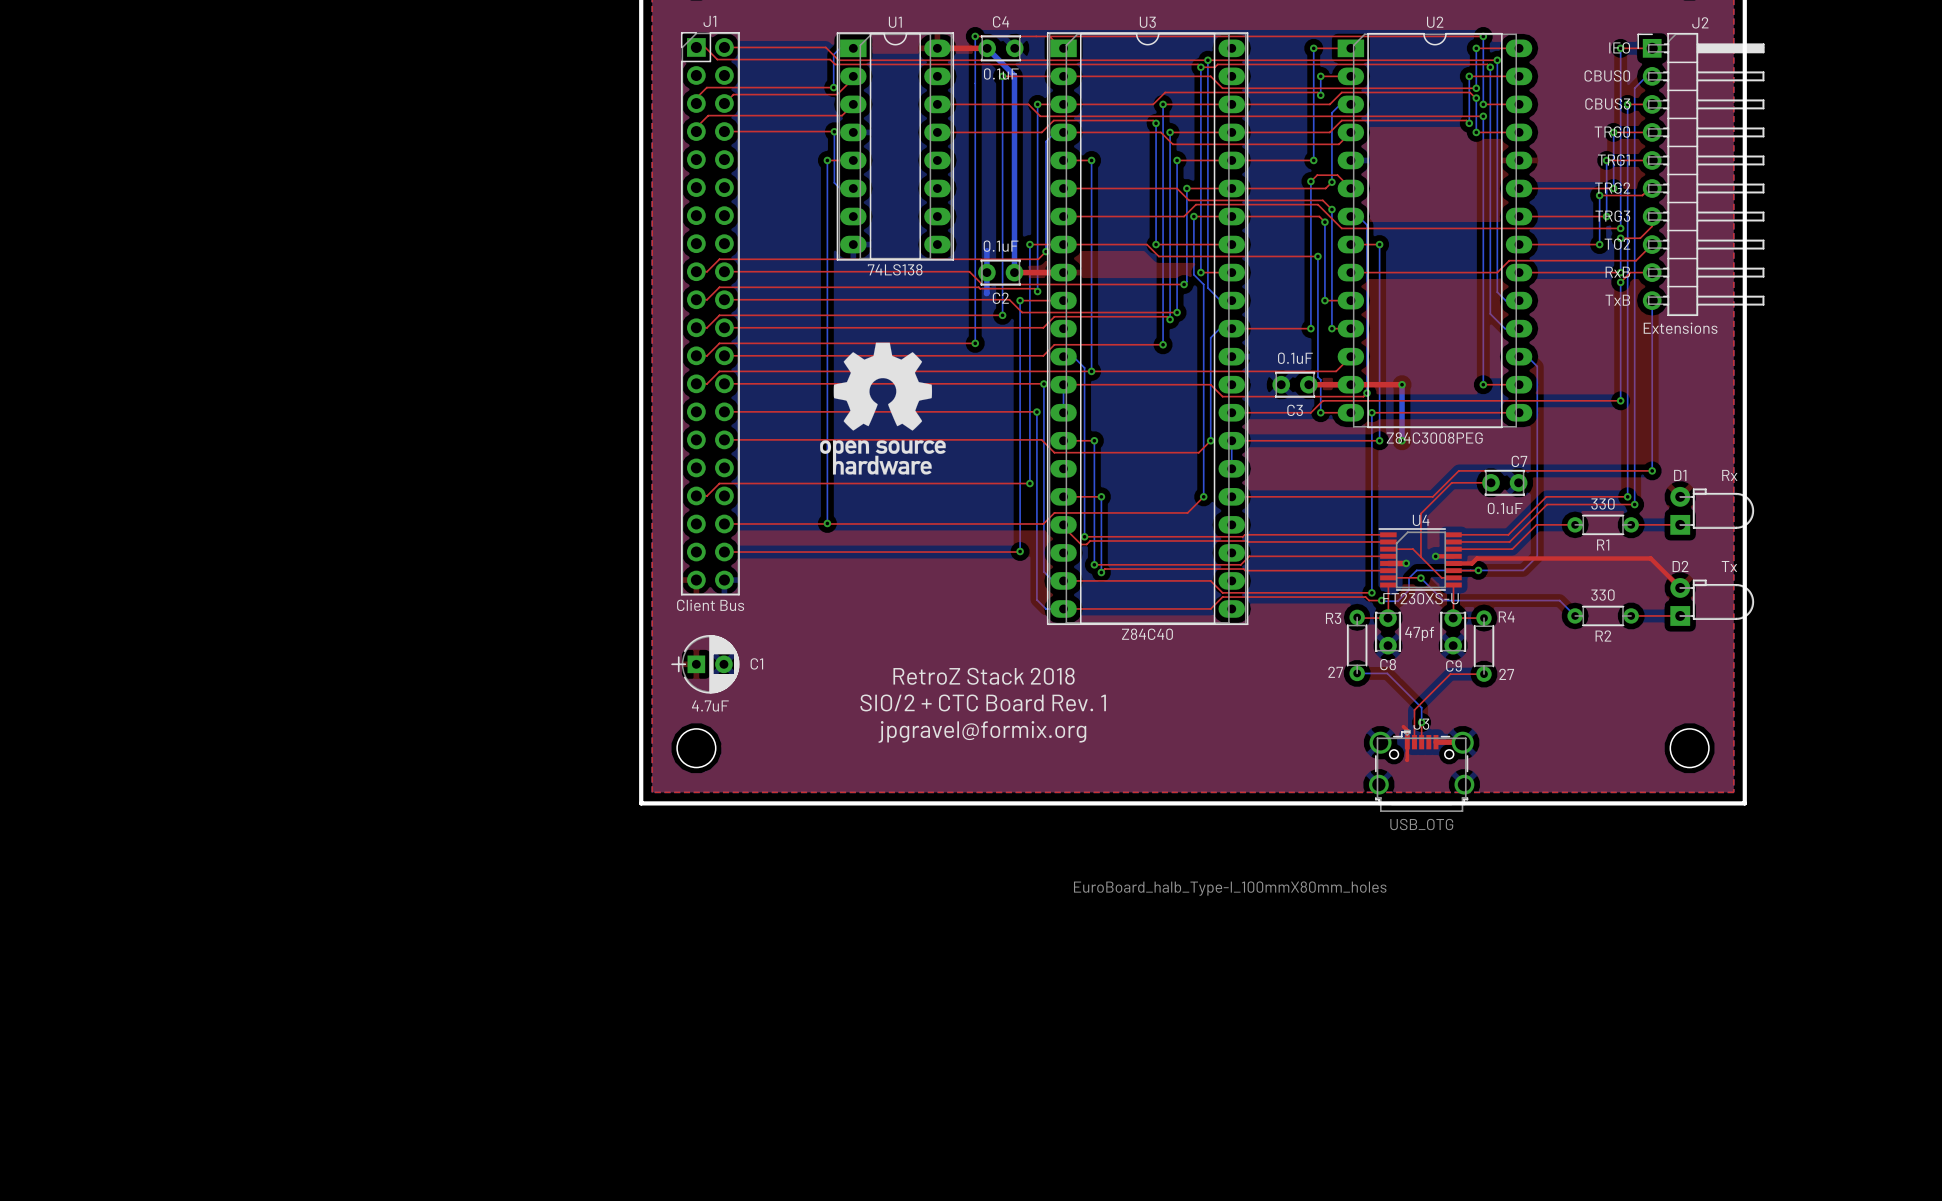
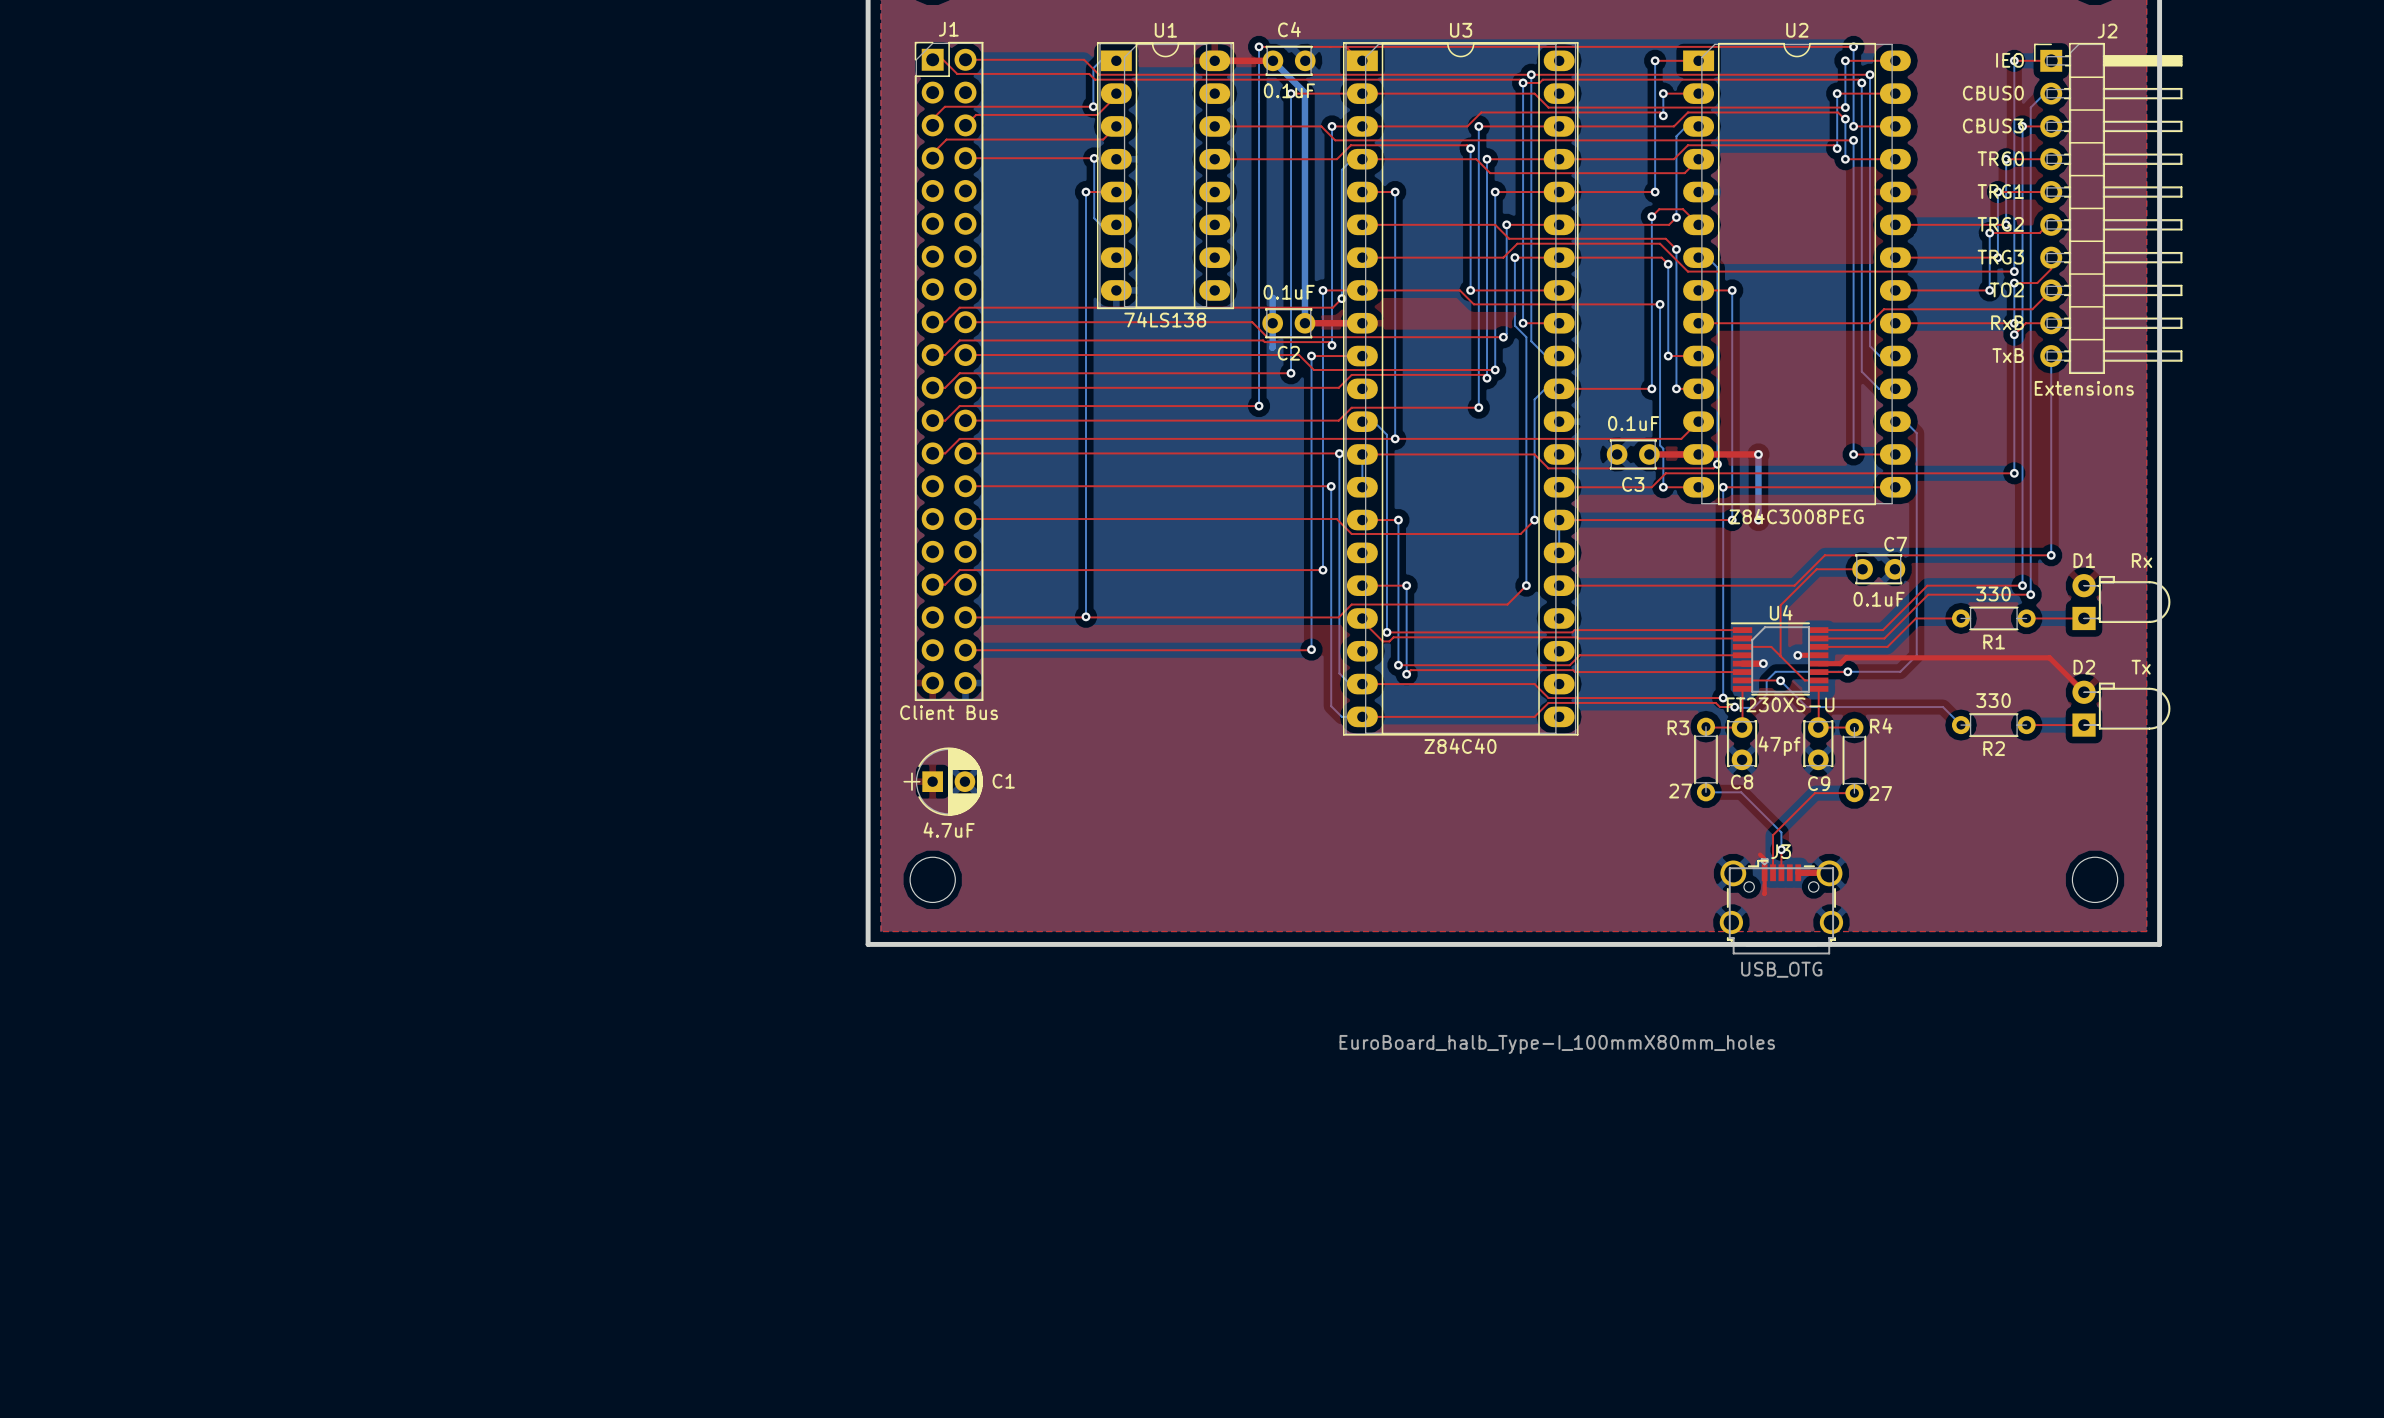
drawing: [820, 342, 946, 475] -> none
text: RetroZ Stack 2018 (984, 676) -> none
text: SIO/2 + CTC Board Rev. 1 (983, 702) -> none
text: jpgravel@formix.org (982, 731) -> none

